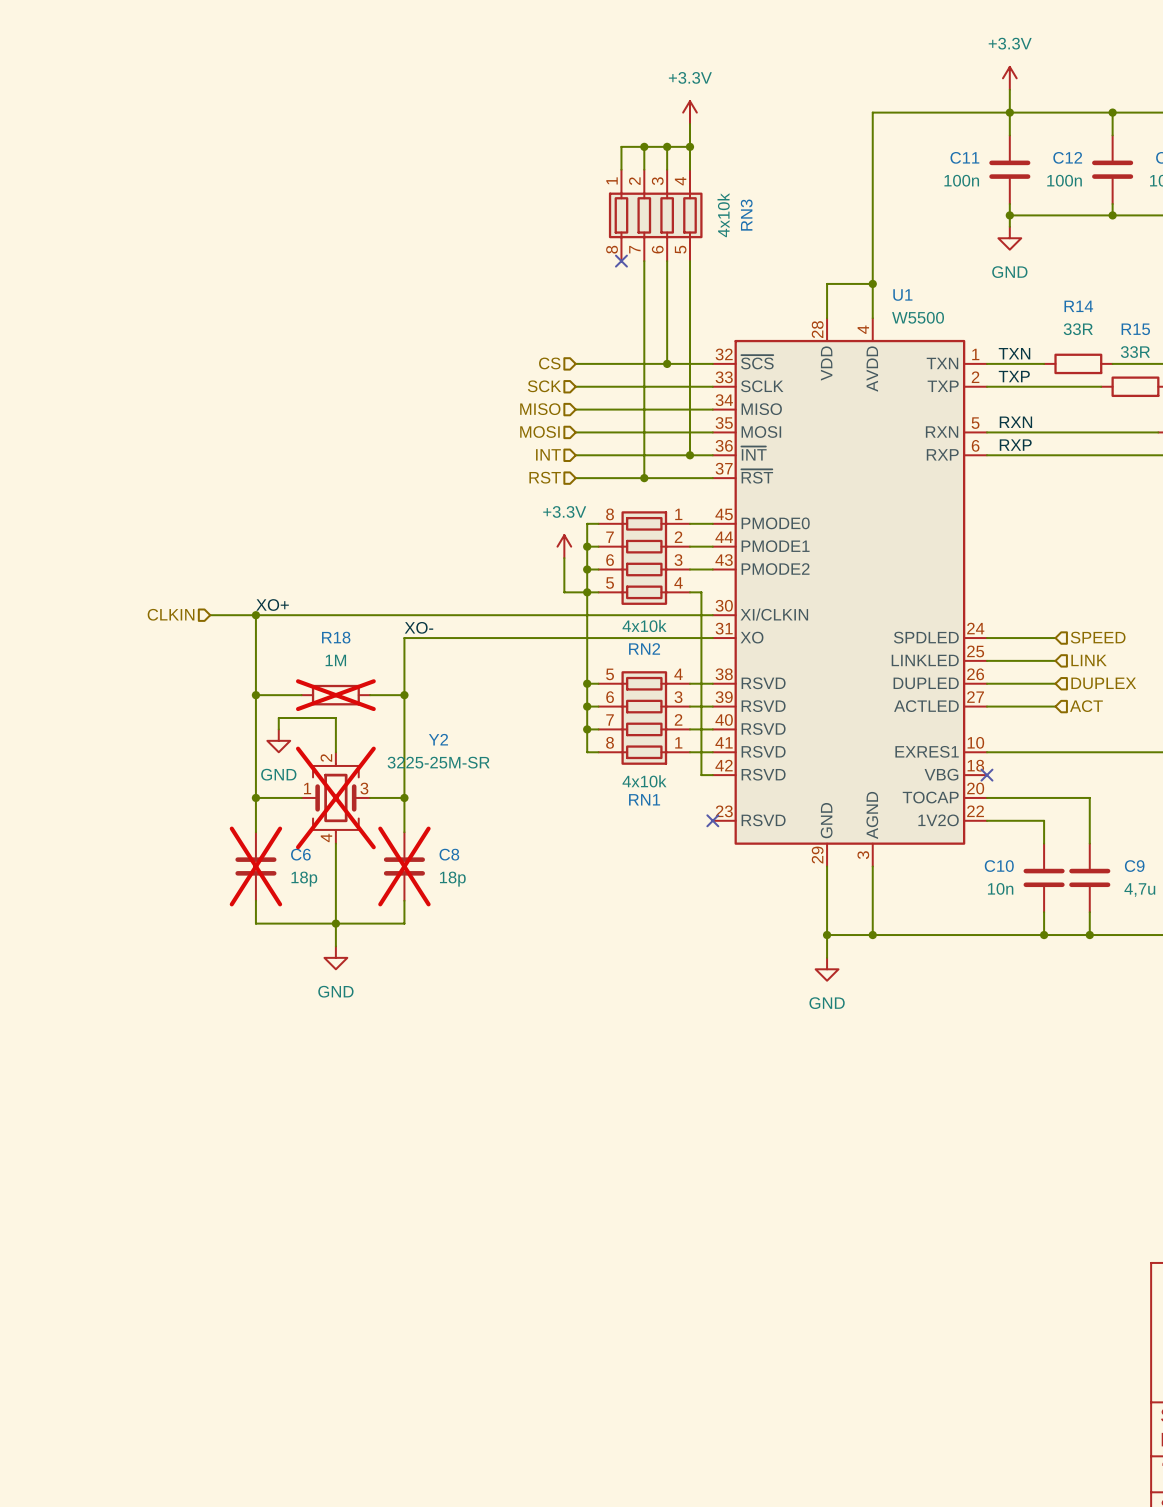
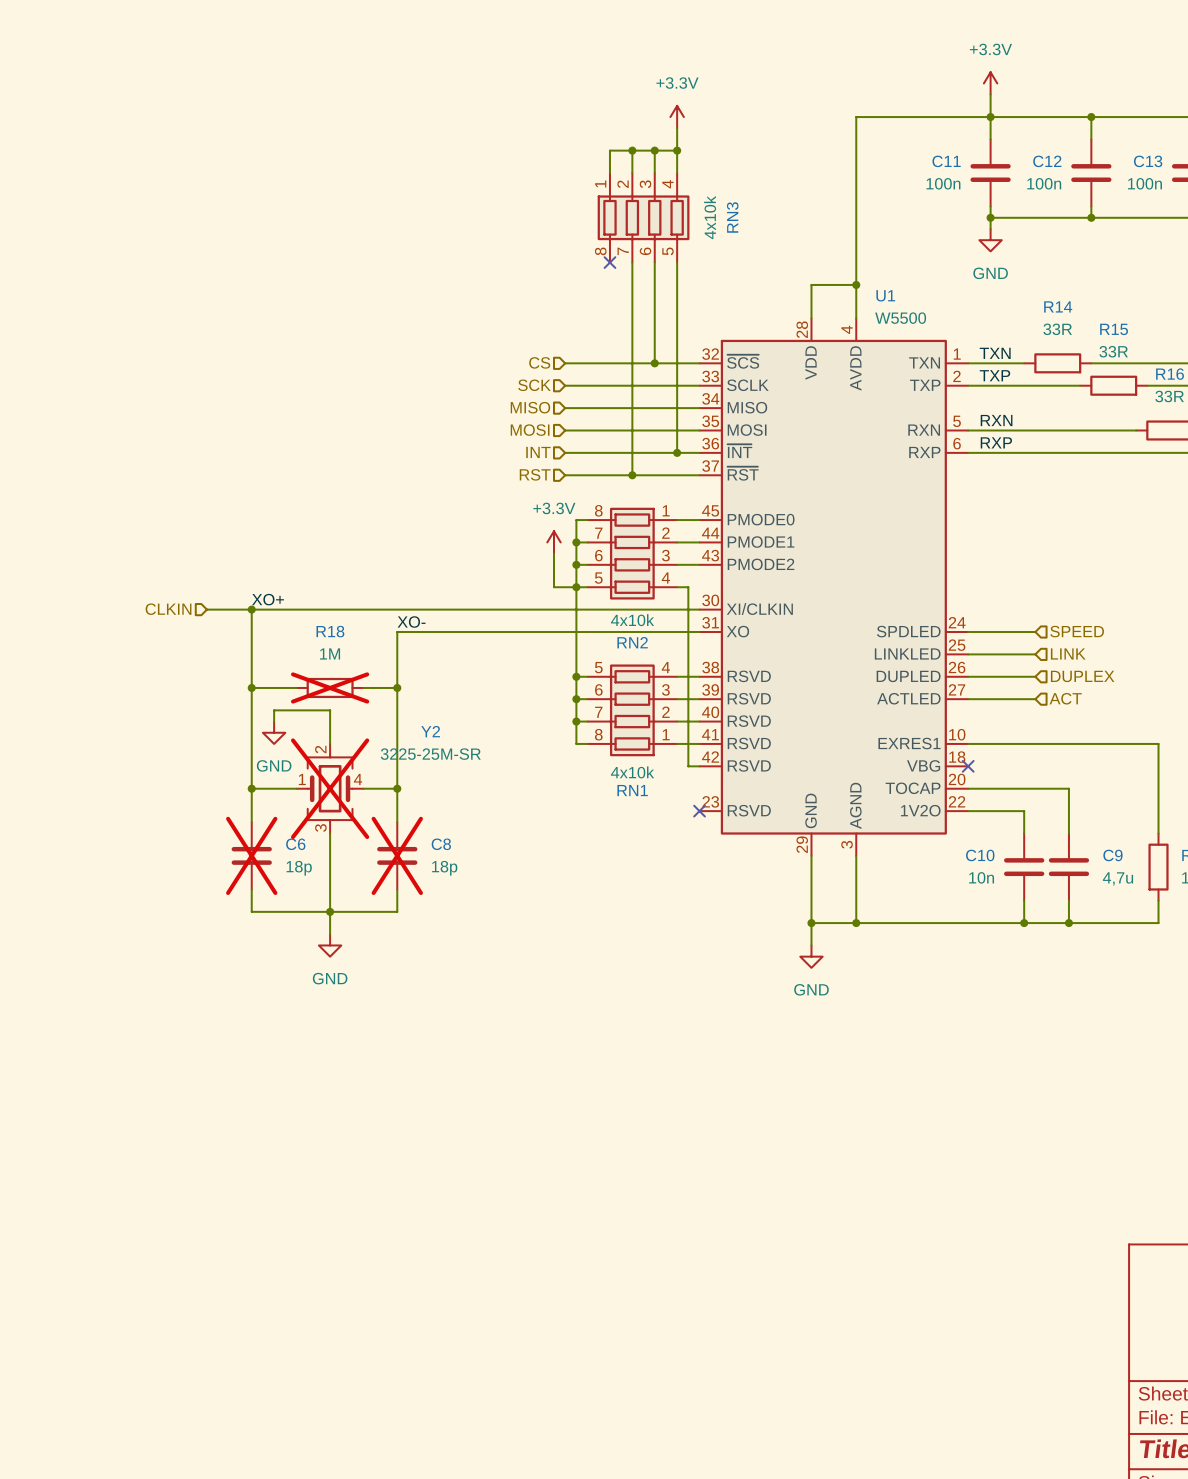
Y2 pin number: 3 (364, 788) -> 4 (358, 779)
Y2 pin number: 4 (326, 837) -> 3 (320, 827)

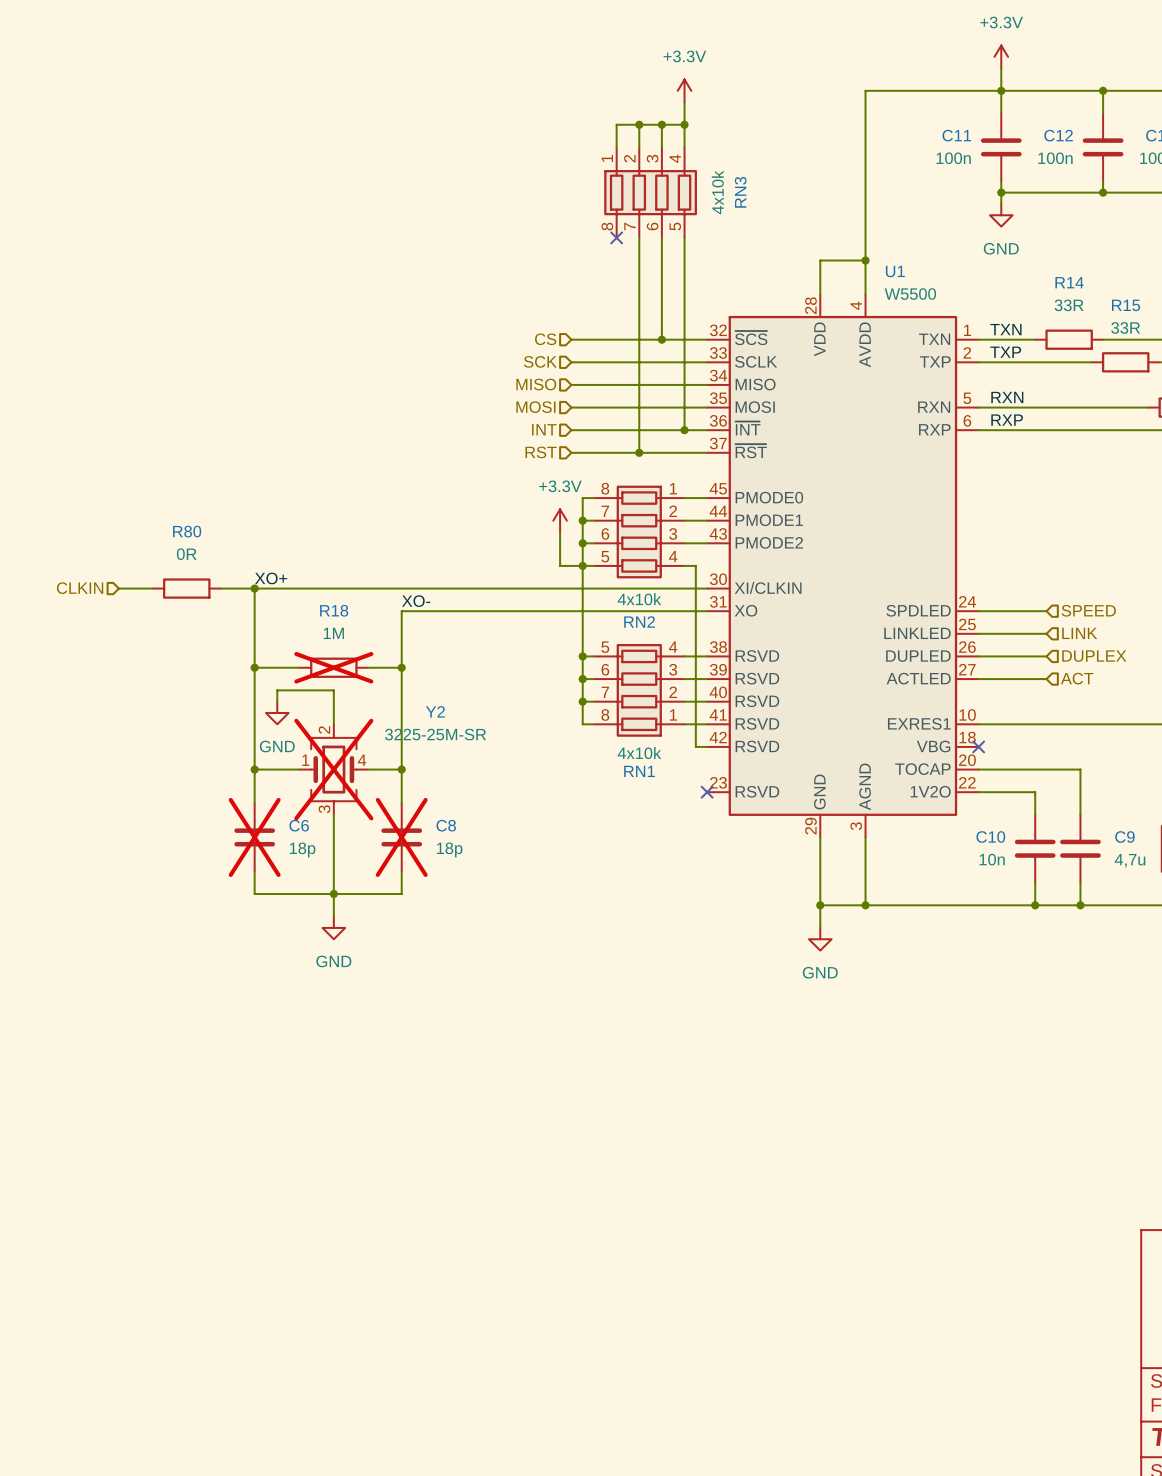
wire: none -> (118, 588) (152, 588)
hierarchical label position: CLKIN (168, 609) -> CLKIN (80, 588)
R80: none -> 0R (186, 588)

